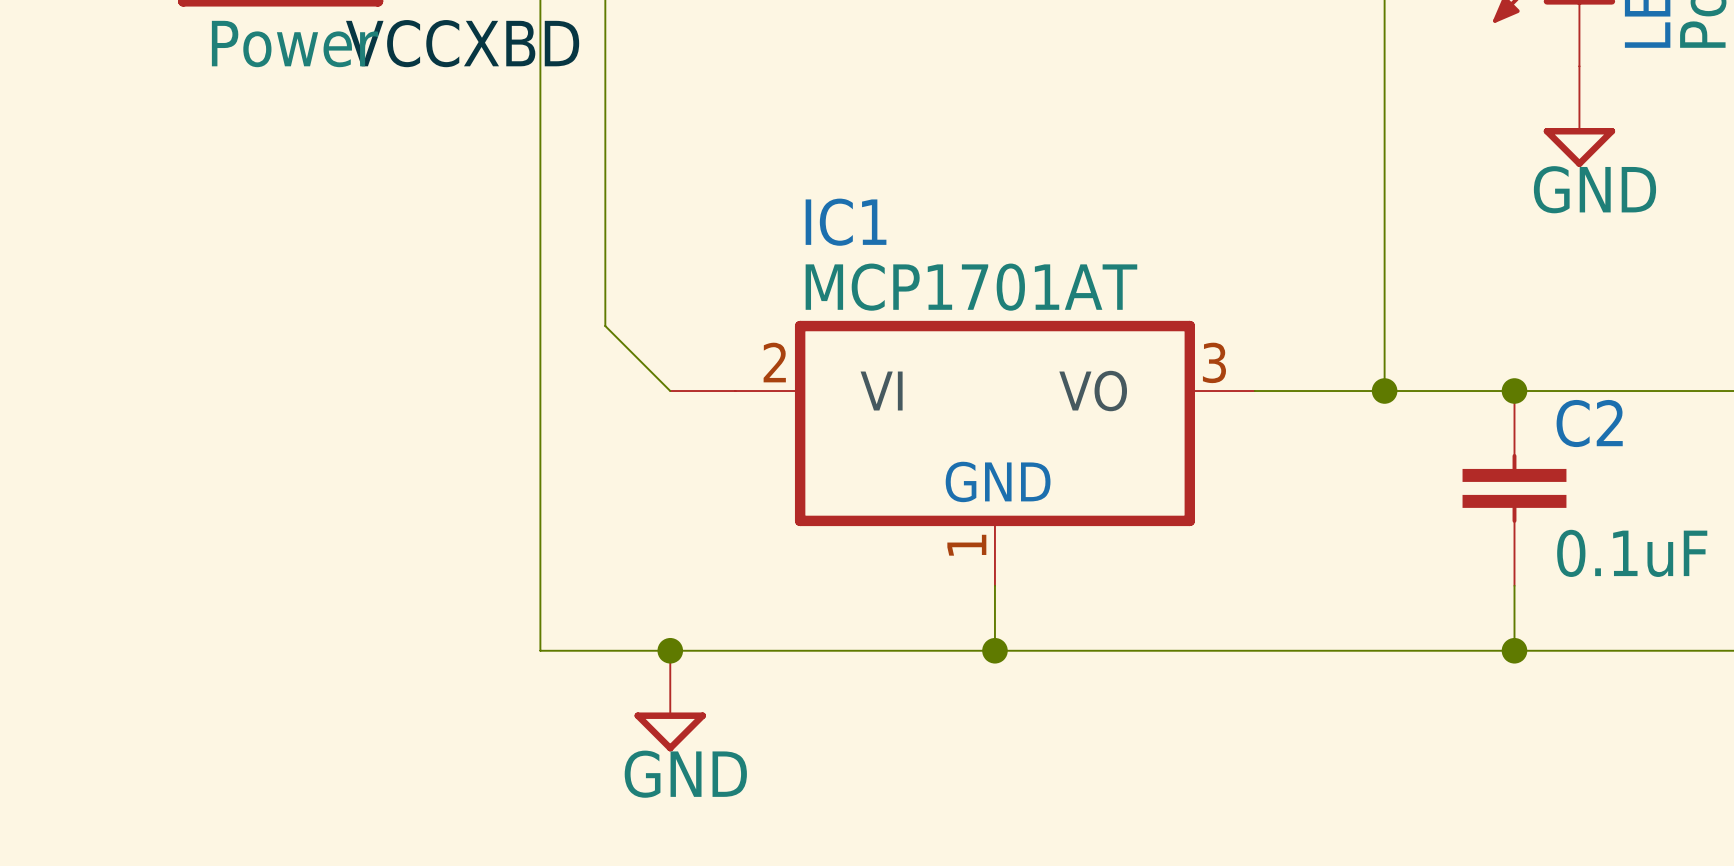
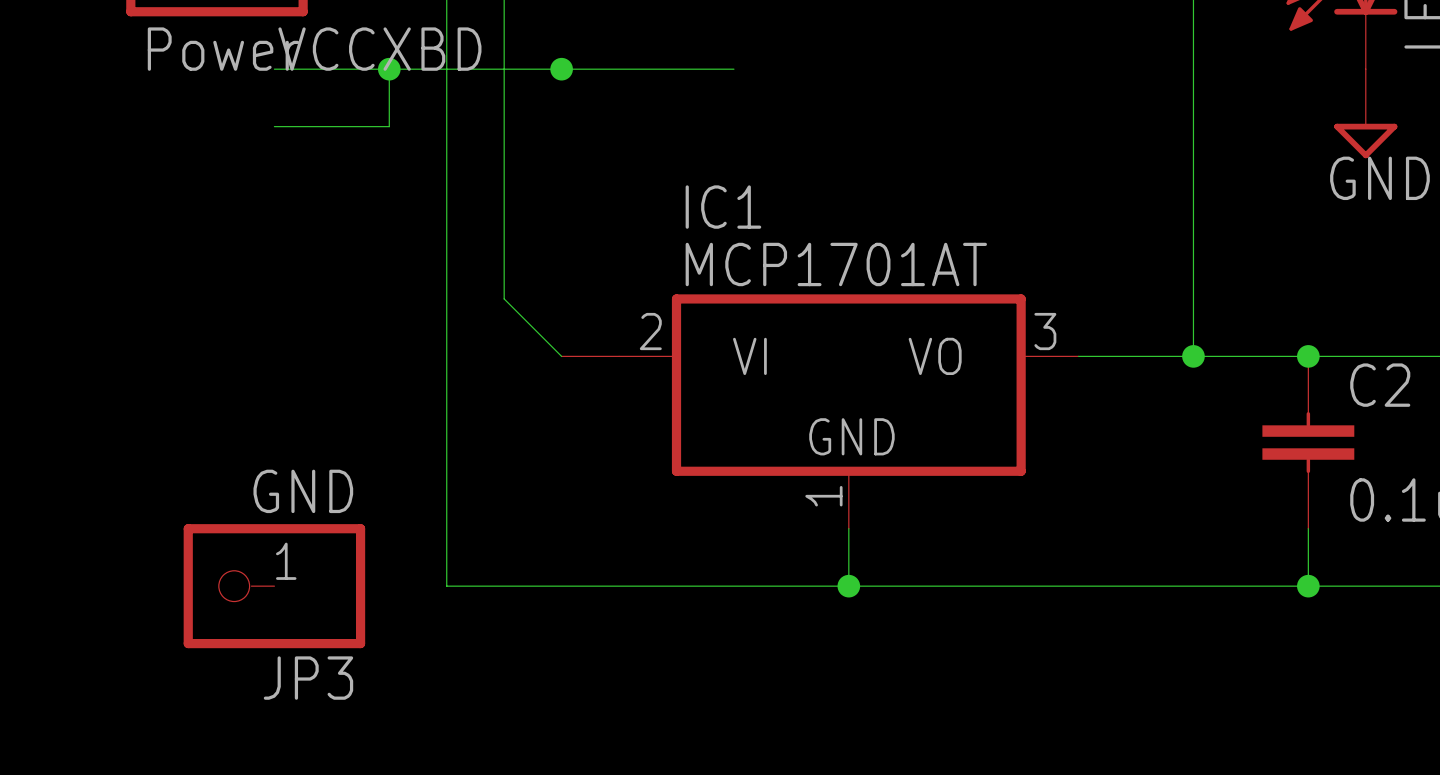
wire: none -> (274, 69) (733, 69)
wire: none -> (389, 69) (389, 126) (274, 126)
junction: none -> (389, 69)
junction: none -> (561, 69)
JP3: none -> GND (274, 586)
junction: (670, 650) -> none
power symbol: GND (670, 701) -> none

